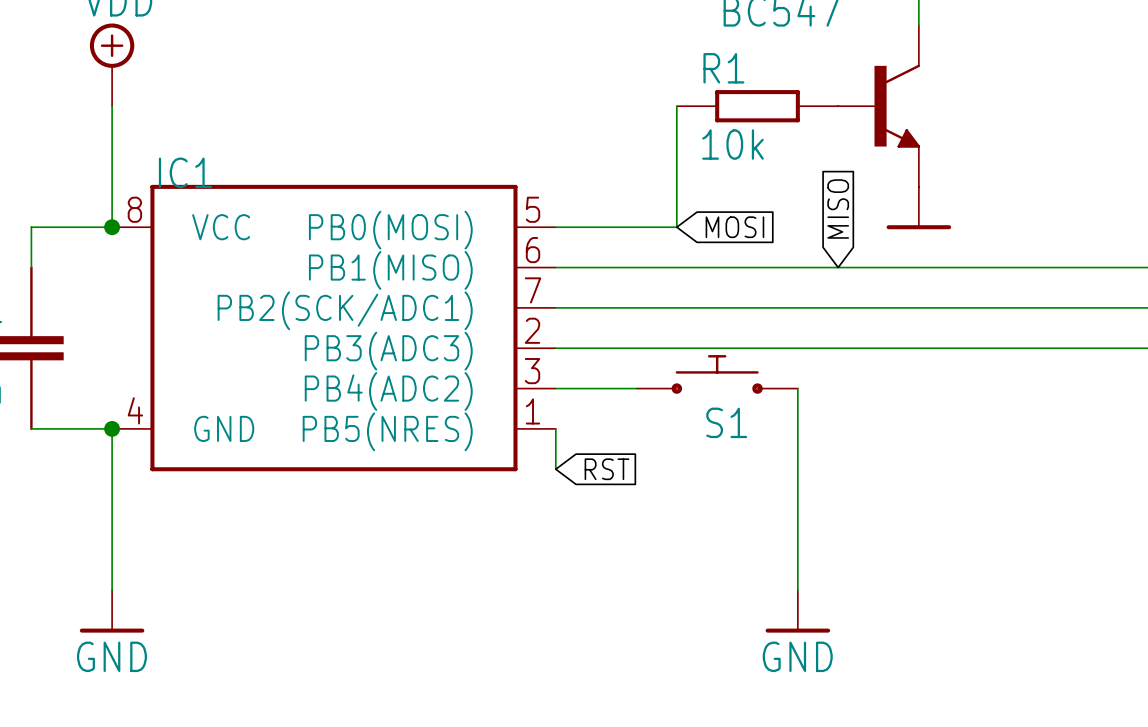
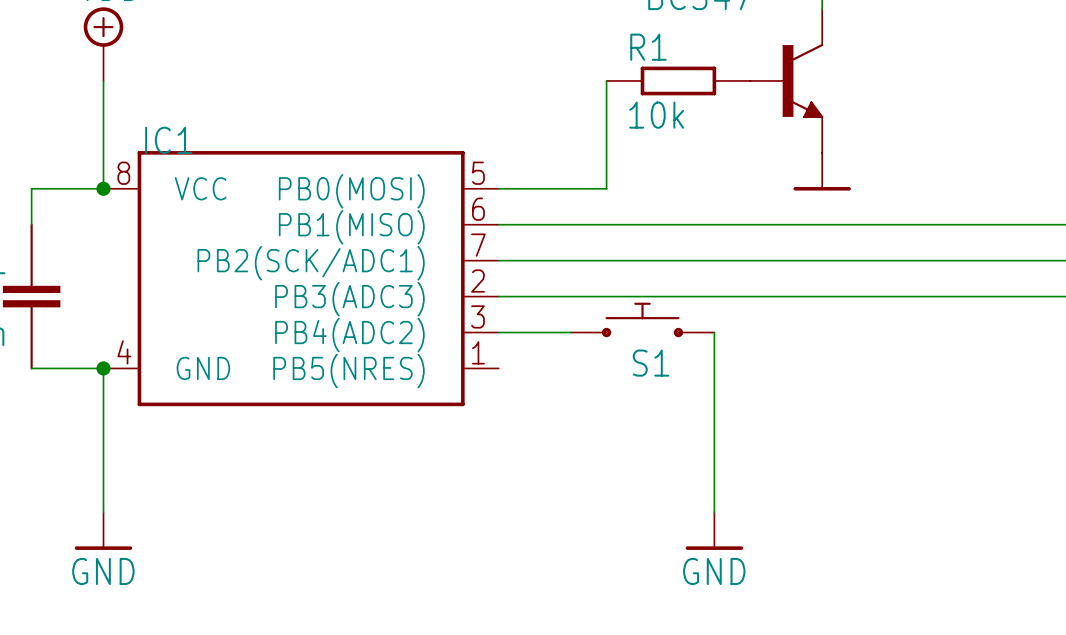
global label: MISO (838, 209) -> none
global label: MOSI (734, 227) -> none
wire: (555, 428) (555, 469) -> none
global label: RST (607, 469) -> none

